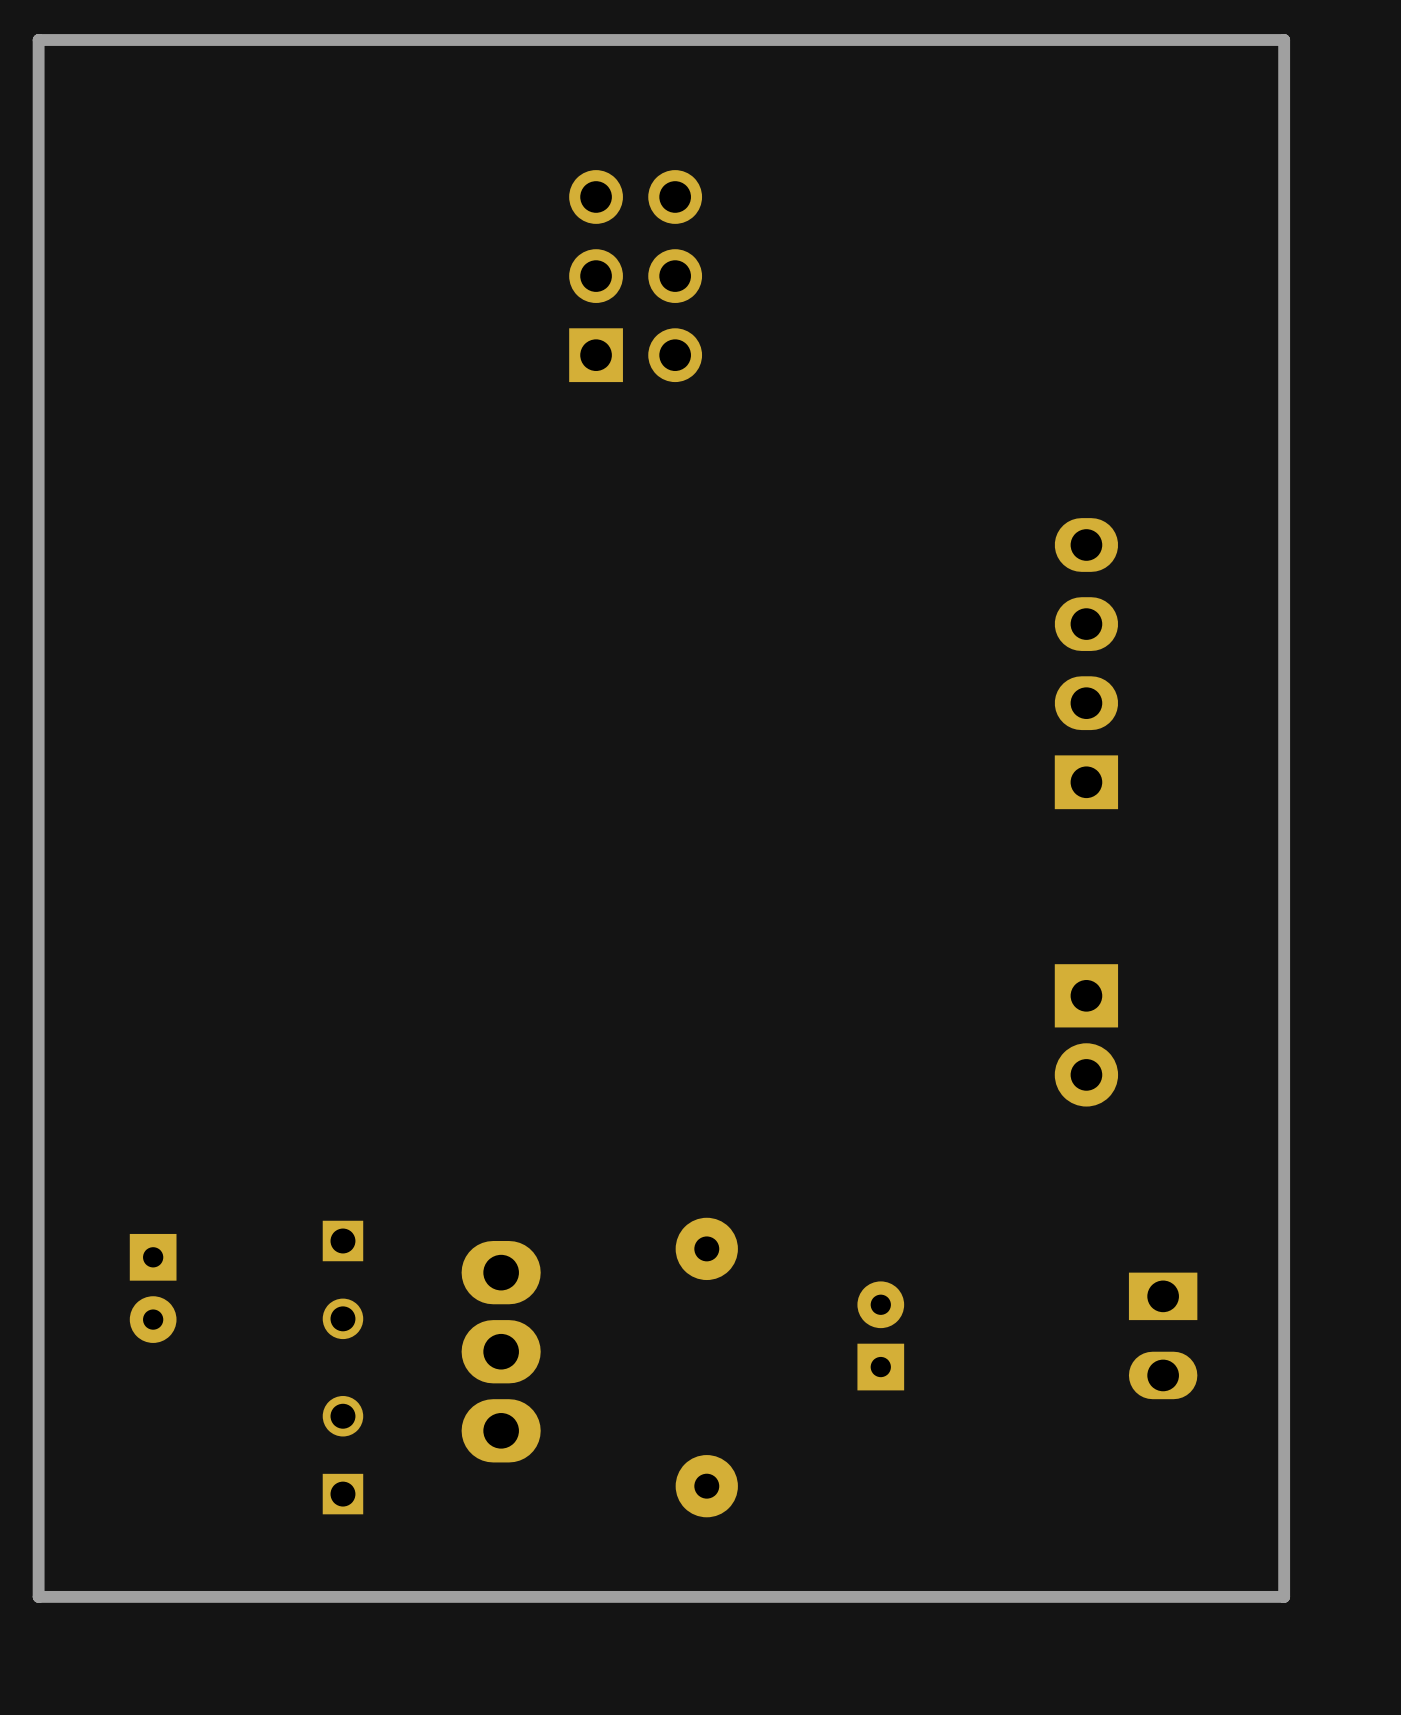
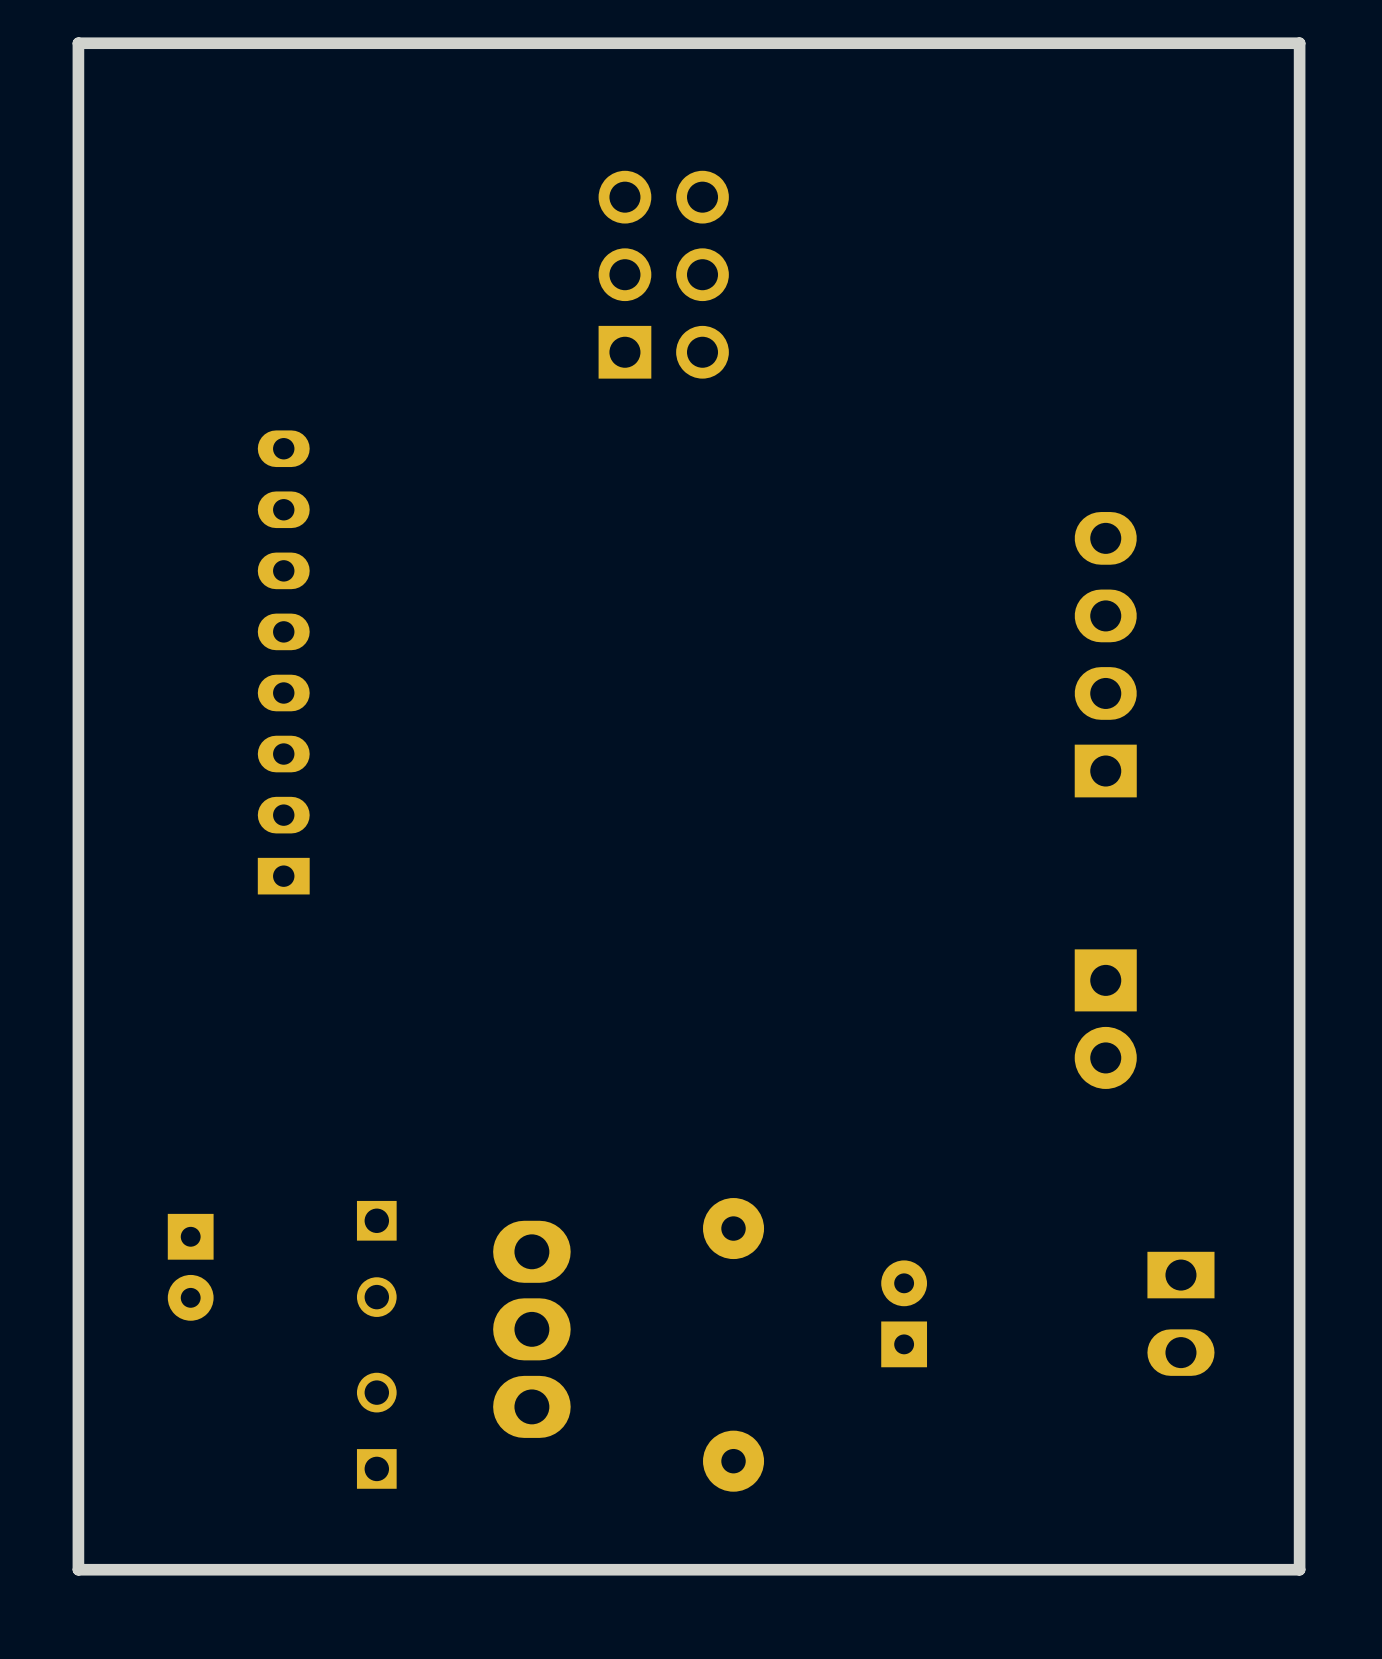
part: none -> (283, 662)

